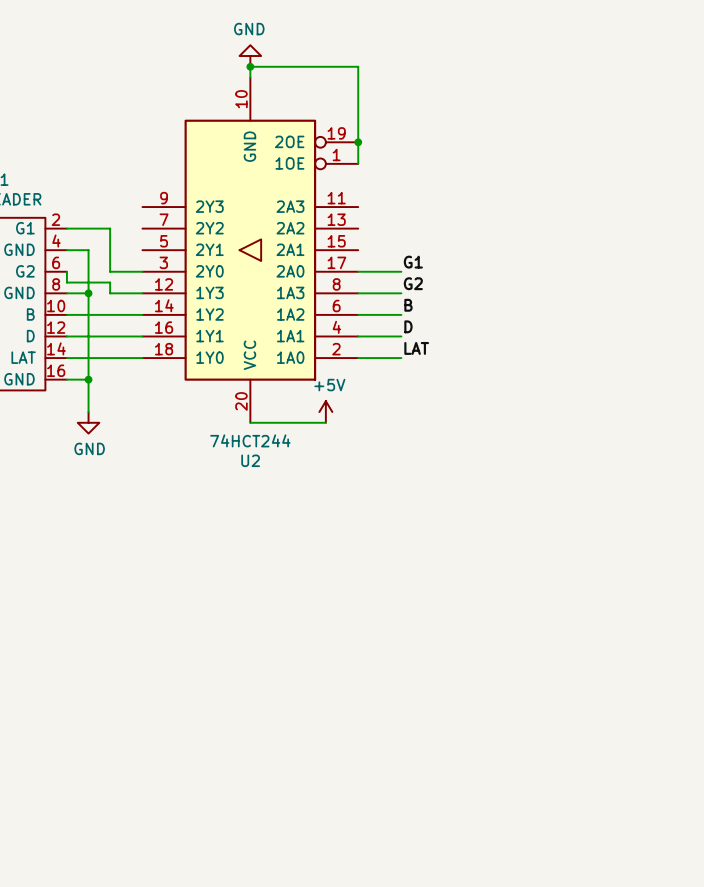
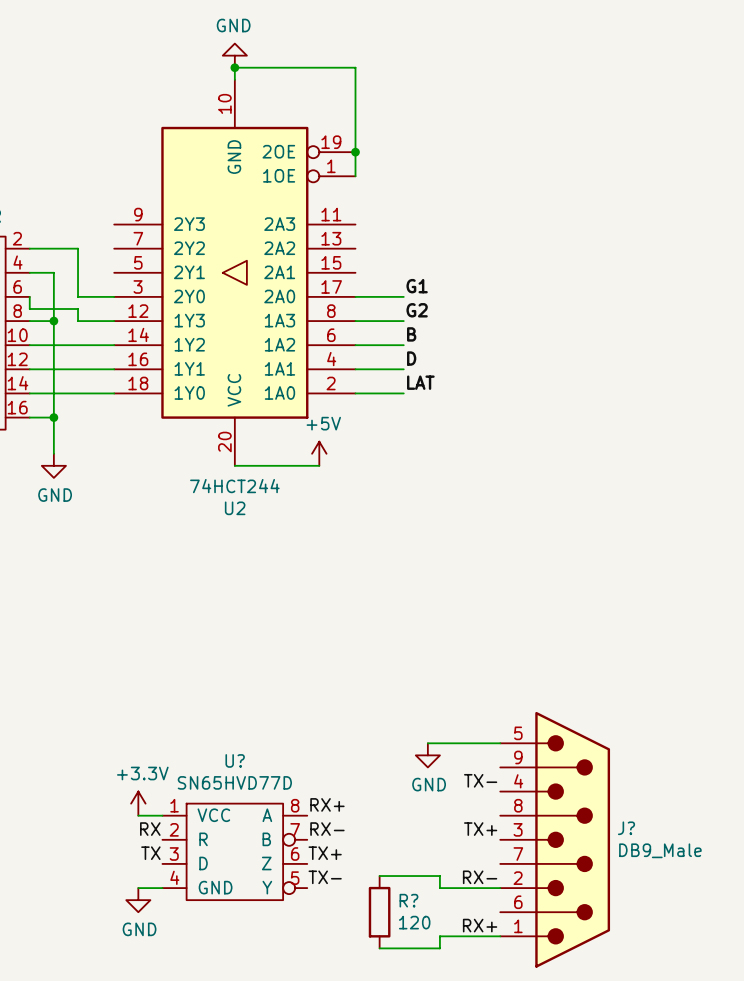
wire: none -> (427, 743) (500, 743)
power symbol: none -> GND (427, 755)
label: none -> TX- (480, 780)
power symbol: none -> +3.3V (138, 803)
label: none -> RX+ (327, 804)
wire: none -> (138, 815) (162, 815)
label: none -> RX (150, 829)
label: none -> RX- (327, 829)
label: none -> TX+ (480, 829)
J?: none -> DB9_Male (555, 839)
U?: none -> SN65HVD77D (234, 851)
label: none -> TX (150, 853)
label: none -> TX+ (325, 853)
wire: none -> (379, 876) (439, 876) (439, 888) (500, 888)
label: none -> TX- (325, 877)
label: none -> RX- (480, 877)
wire: none -> (138, 888) (162, 888)
power symbol: none -> GND (138, 900)
R?: none -> 120 (379, 912)
label: none -> RX+ (480, 925)
wire: none -> (500, 936) (439, 936) (439, 948) (379, 948)

